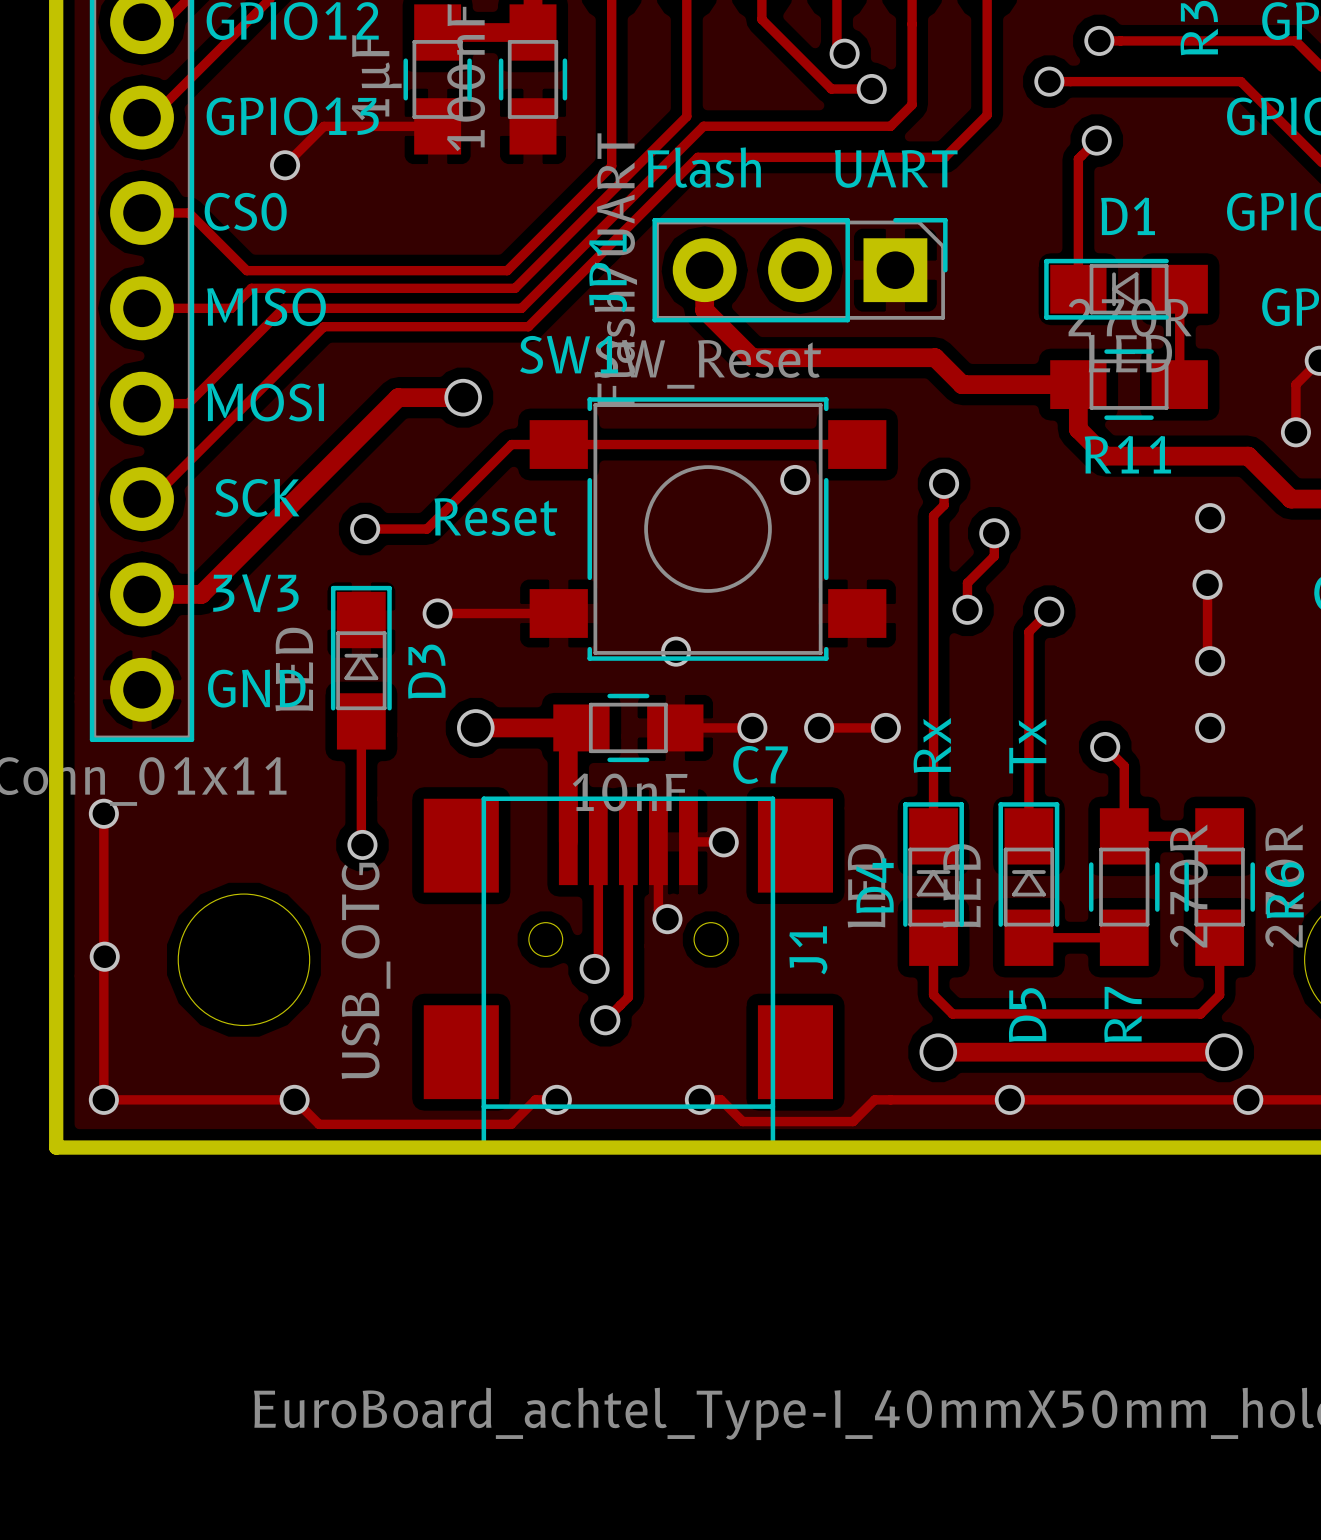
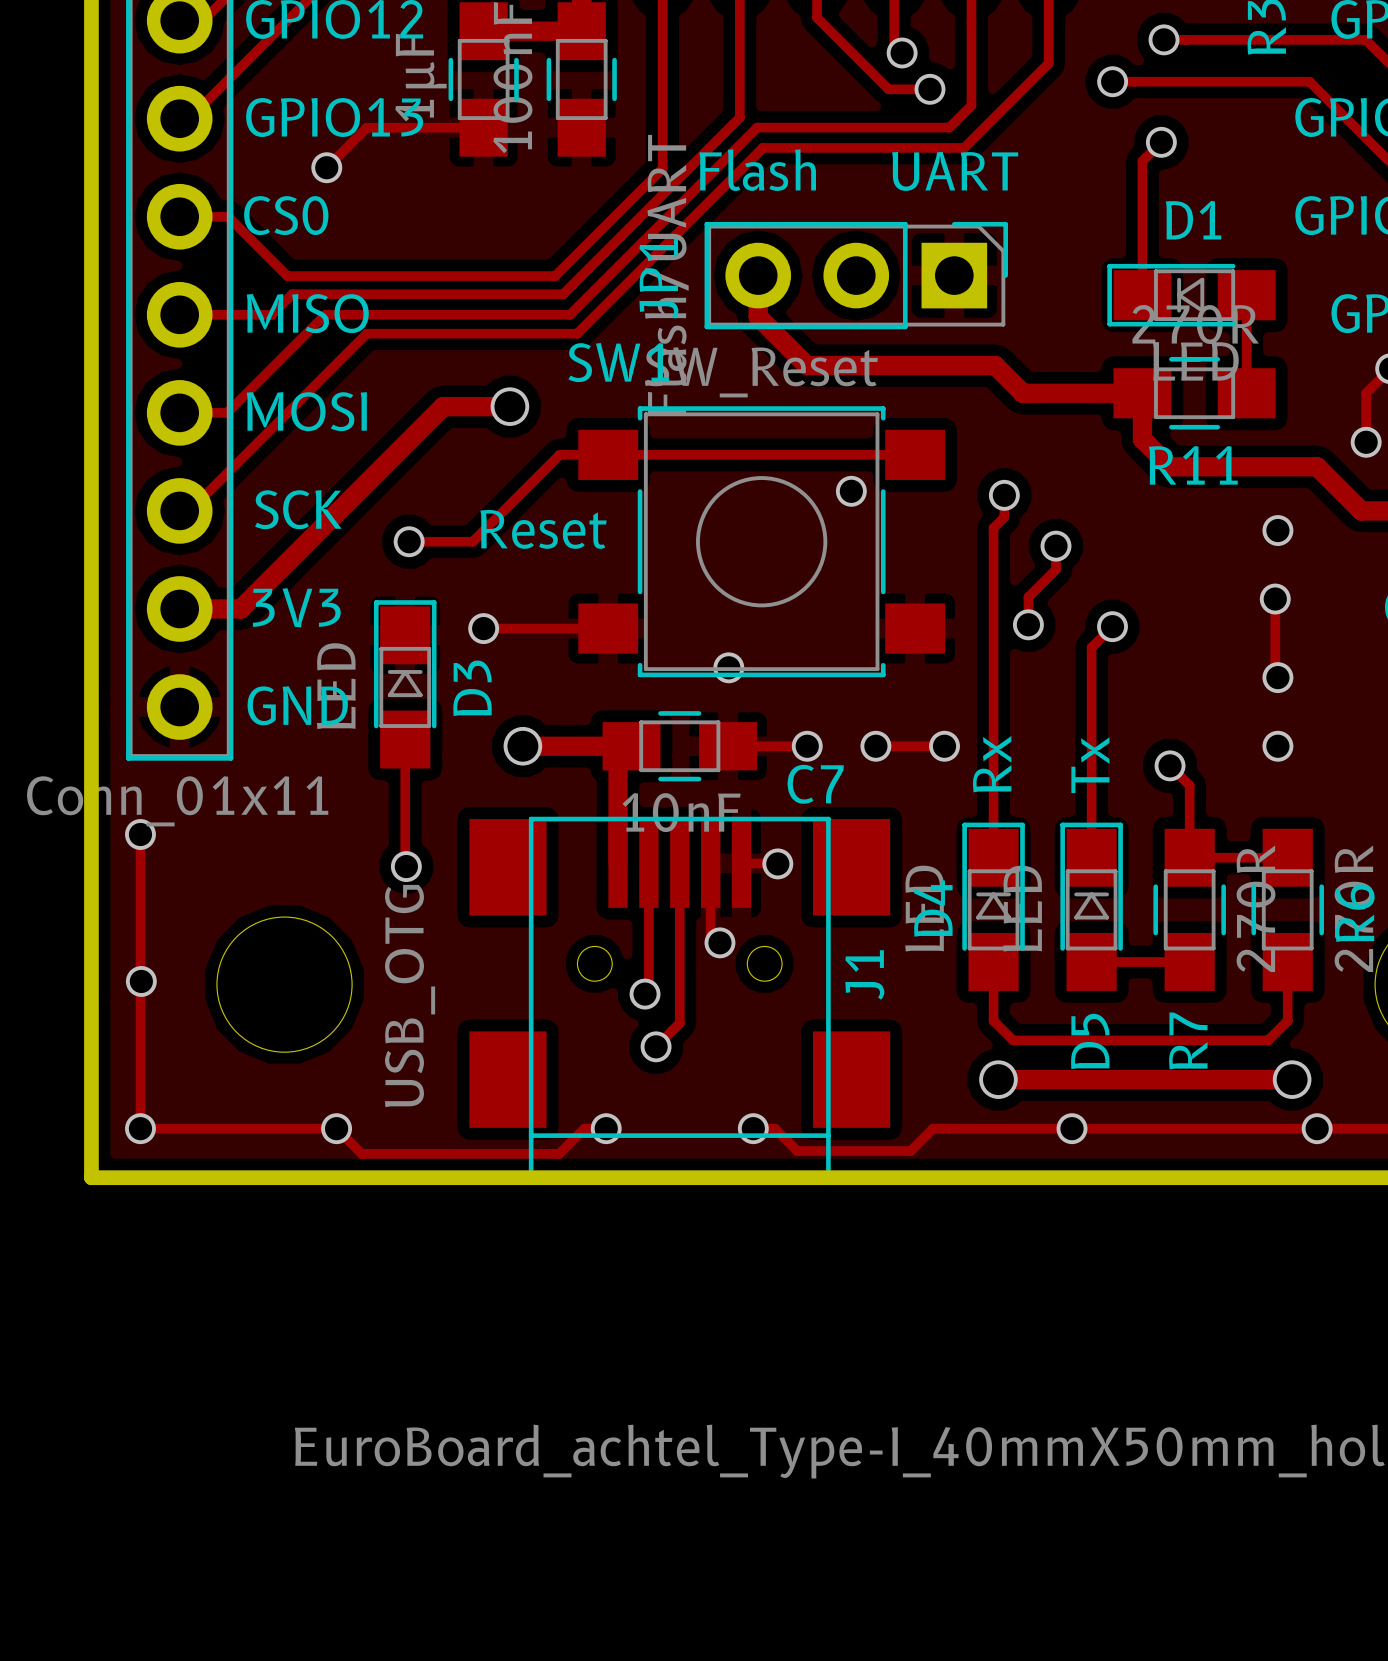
track: (987, 63) (987, 115) (944, 157) (697, 157) -> (1048, 63) (964, 147) (762, 147) (751, 159)

